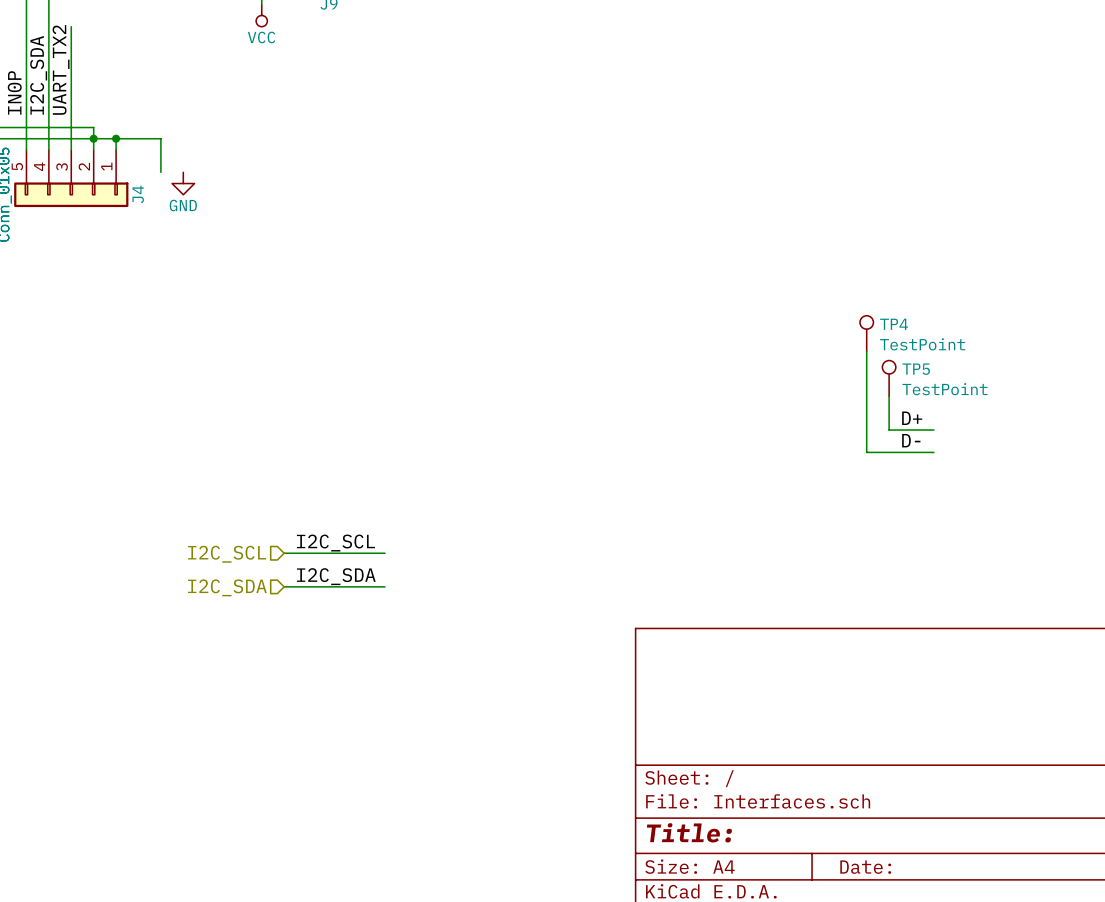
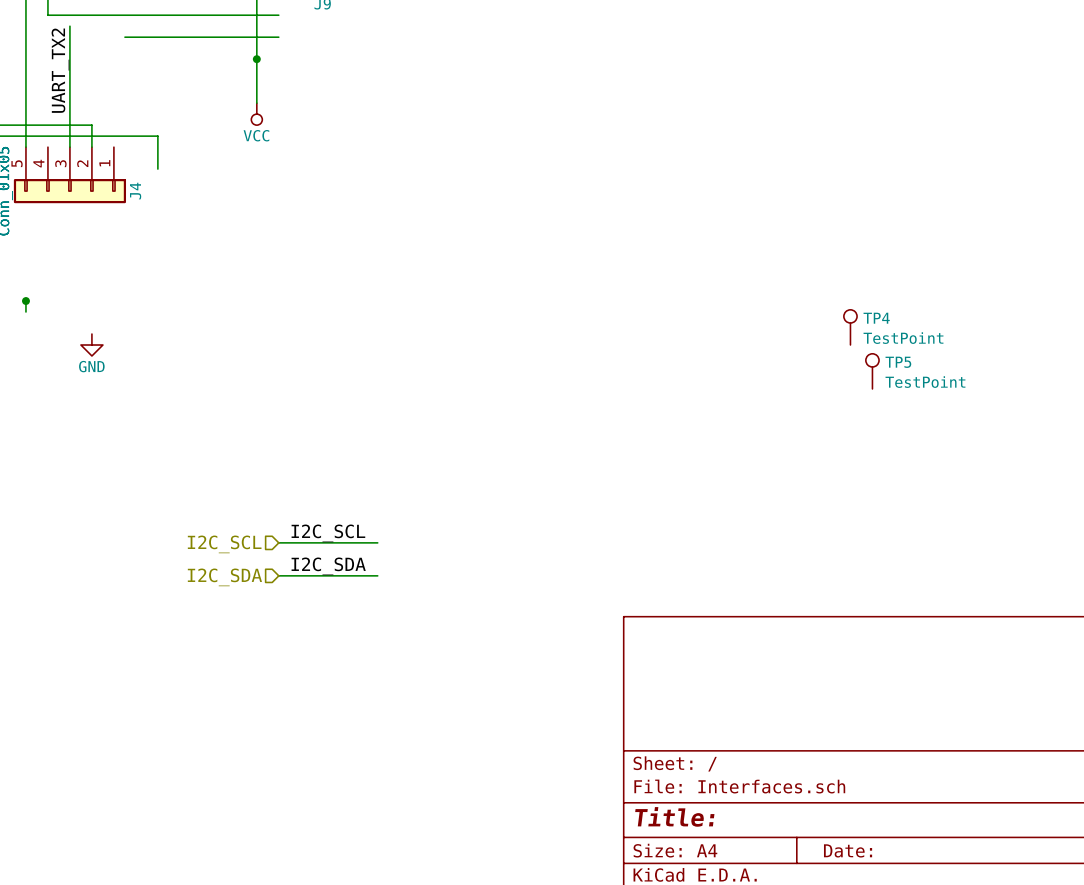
wire: none -> (256, 4) (256, 103)
wire: (48, 15) (48, 149) -> (47, 15) (278, 15)
power symbol position: VCC (261, 15) -> VCC (256, 114)
wire: none -> (124, 37) (278, 37)
junction: none -> (256, 59)
label: I2C_SDA (38, 75) -> none
label: IN0P (14, 92) -> none
junction: (93, 138) -> none
wire: (116, 138) (116, 149) -> (25, 301) (25, 312)
junction: (116, 138) -> none
power symbol: GND (183, 183) -> none
junction: none -> (25, 301)
power symbol: none -> GND (91, 345)
wire: (866, 351) (866, 452) (933, 452) -> none
wire: (889, 396) (889, 430) (933, 430) -> none
label: D+ (912, 418) -> none
label: D- (911, 440) -> none

